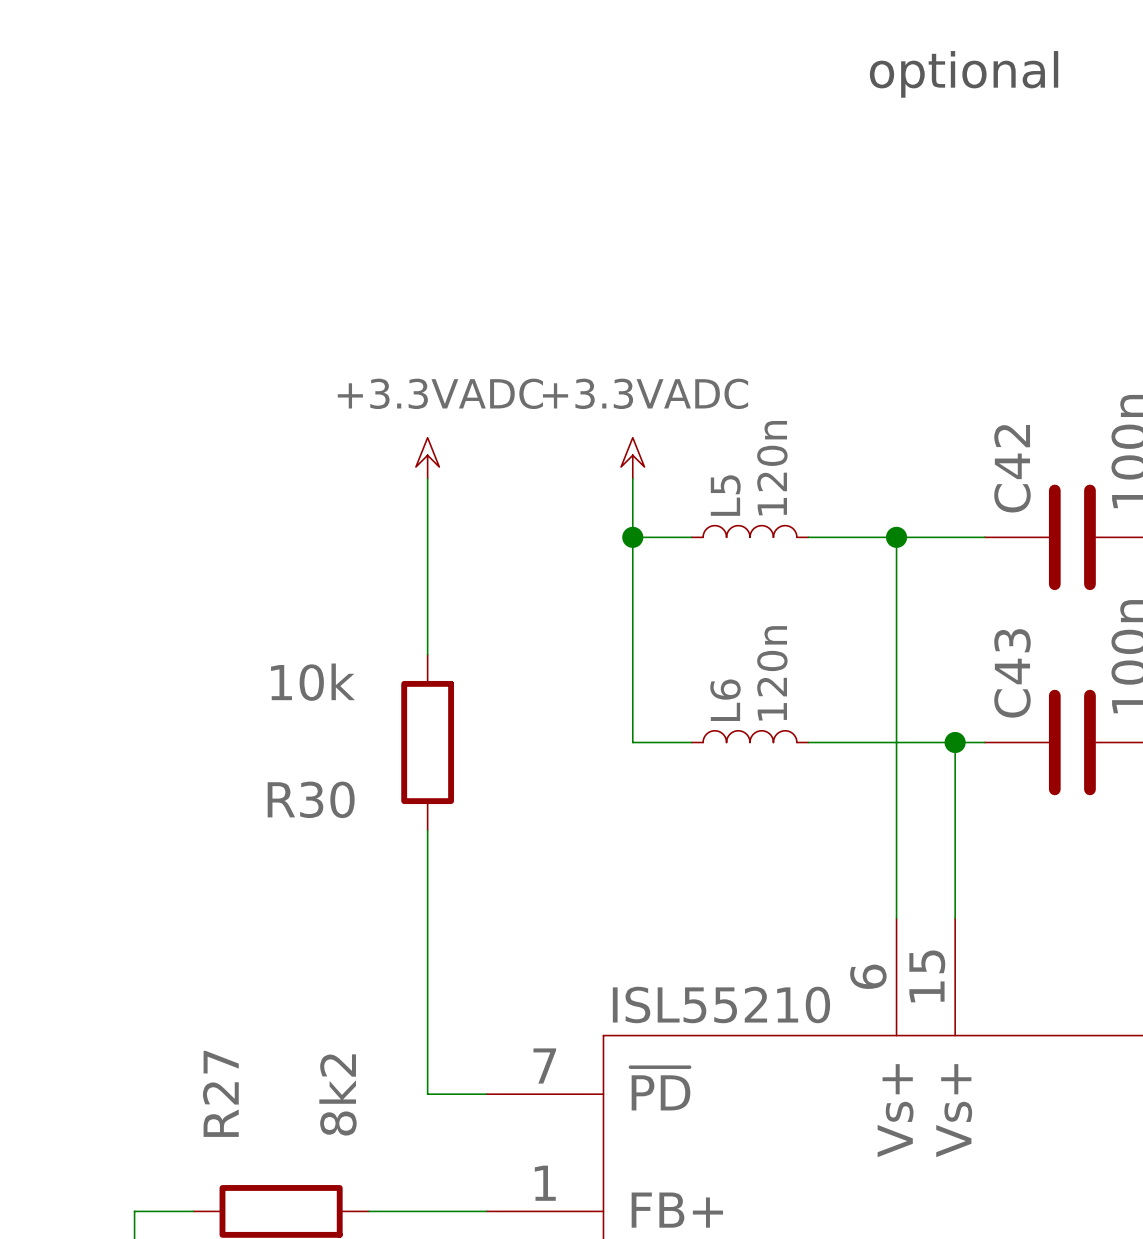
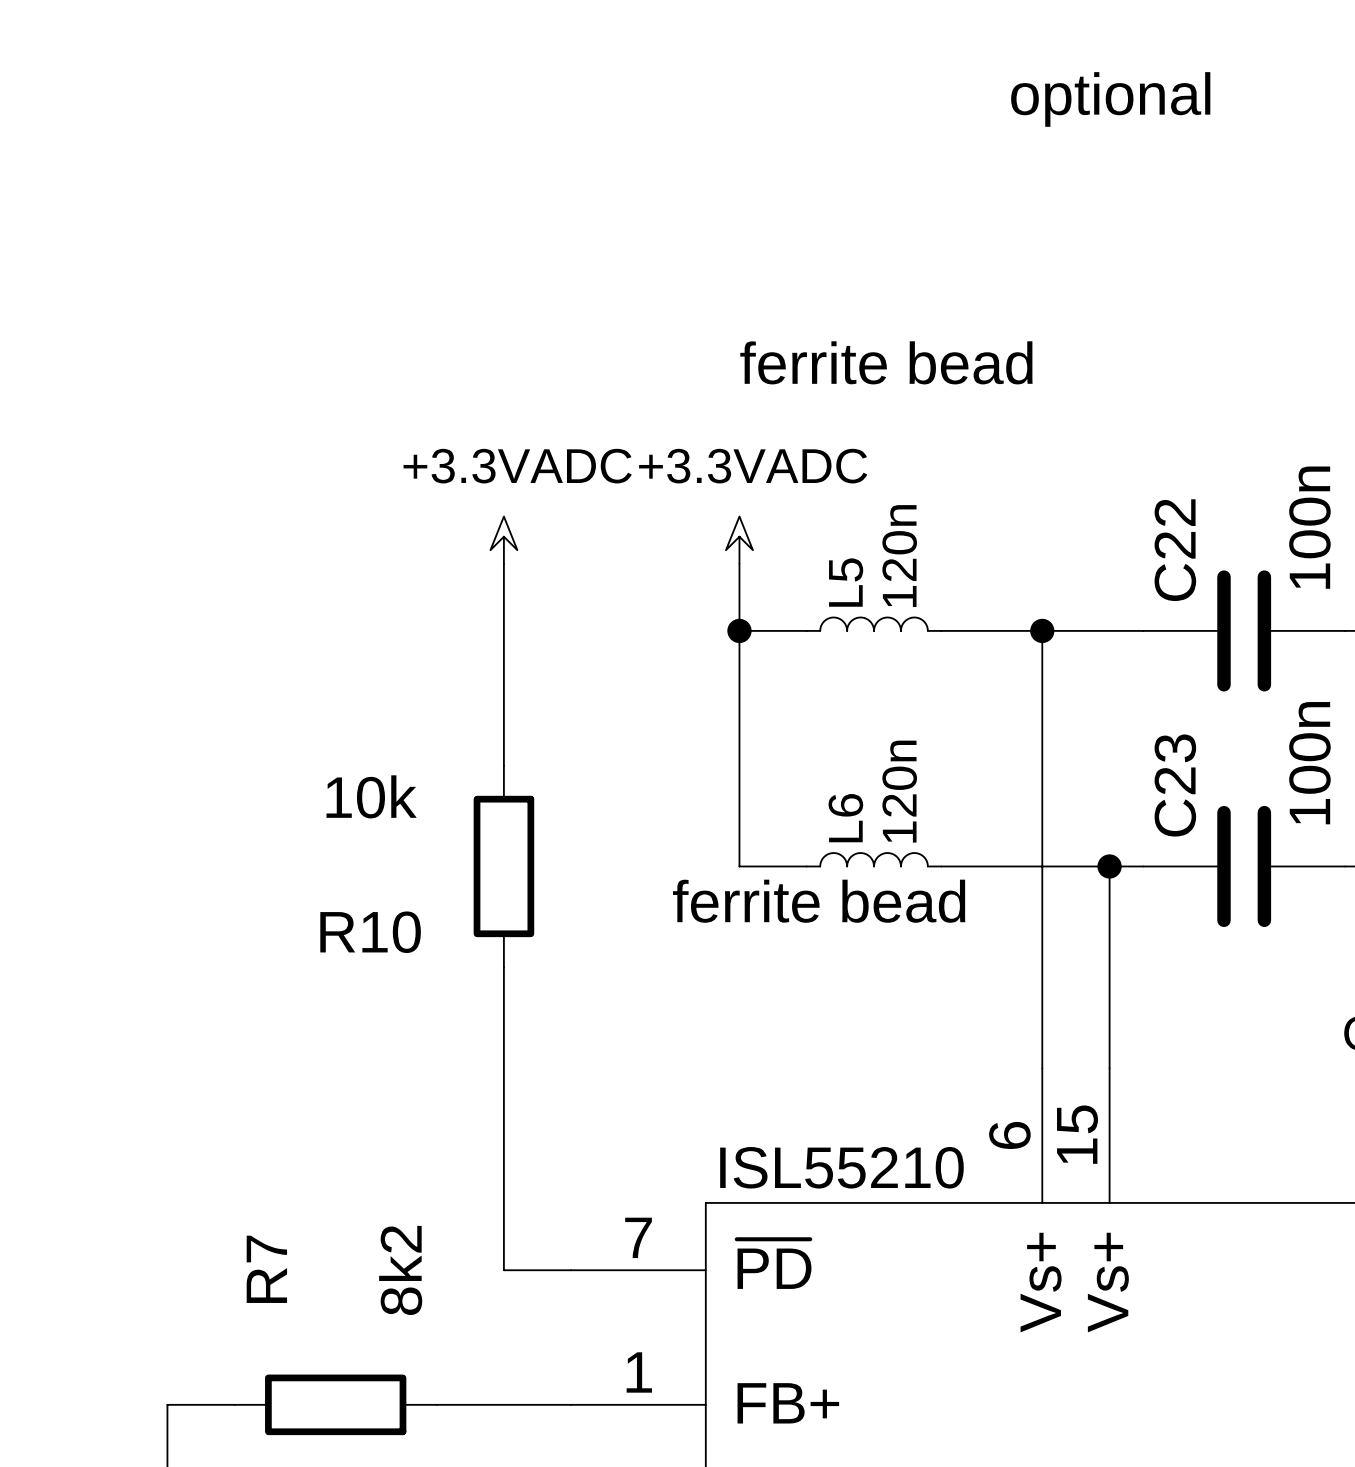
text: none -> ferrite bead (886, 362)
C42 name: C42 (1012, 468) -> C22 (1175, 550)
C43 name: C43 (1012, 673) -> C23 (1175, 785)
text: none -> ferrite bead (819, 901)
R30 name: R30 (311, 799) -> R10 (370, 932)
R27 name: R27 (220, 1093) -> R7 (266, 1269)

